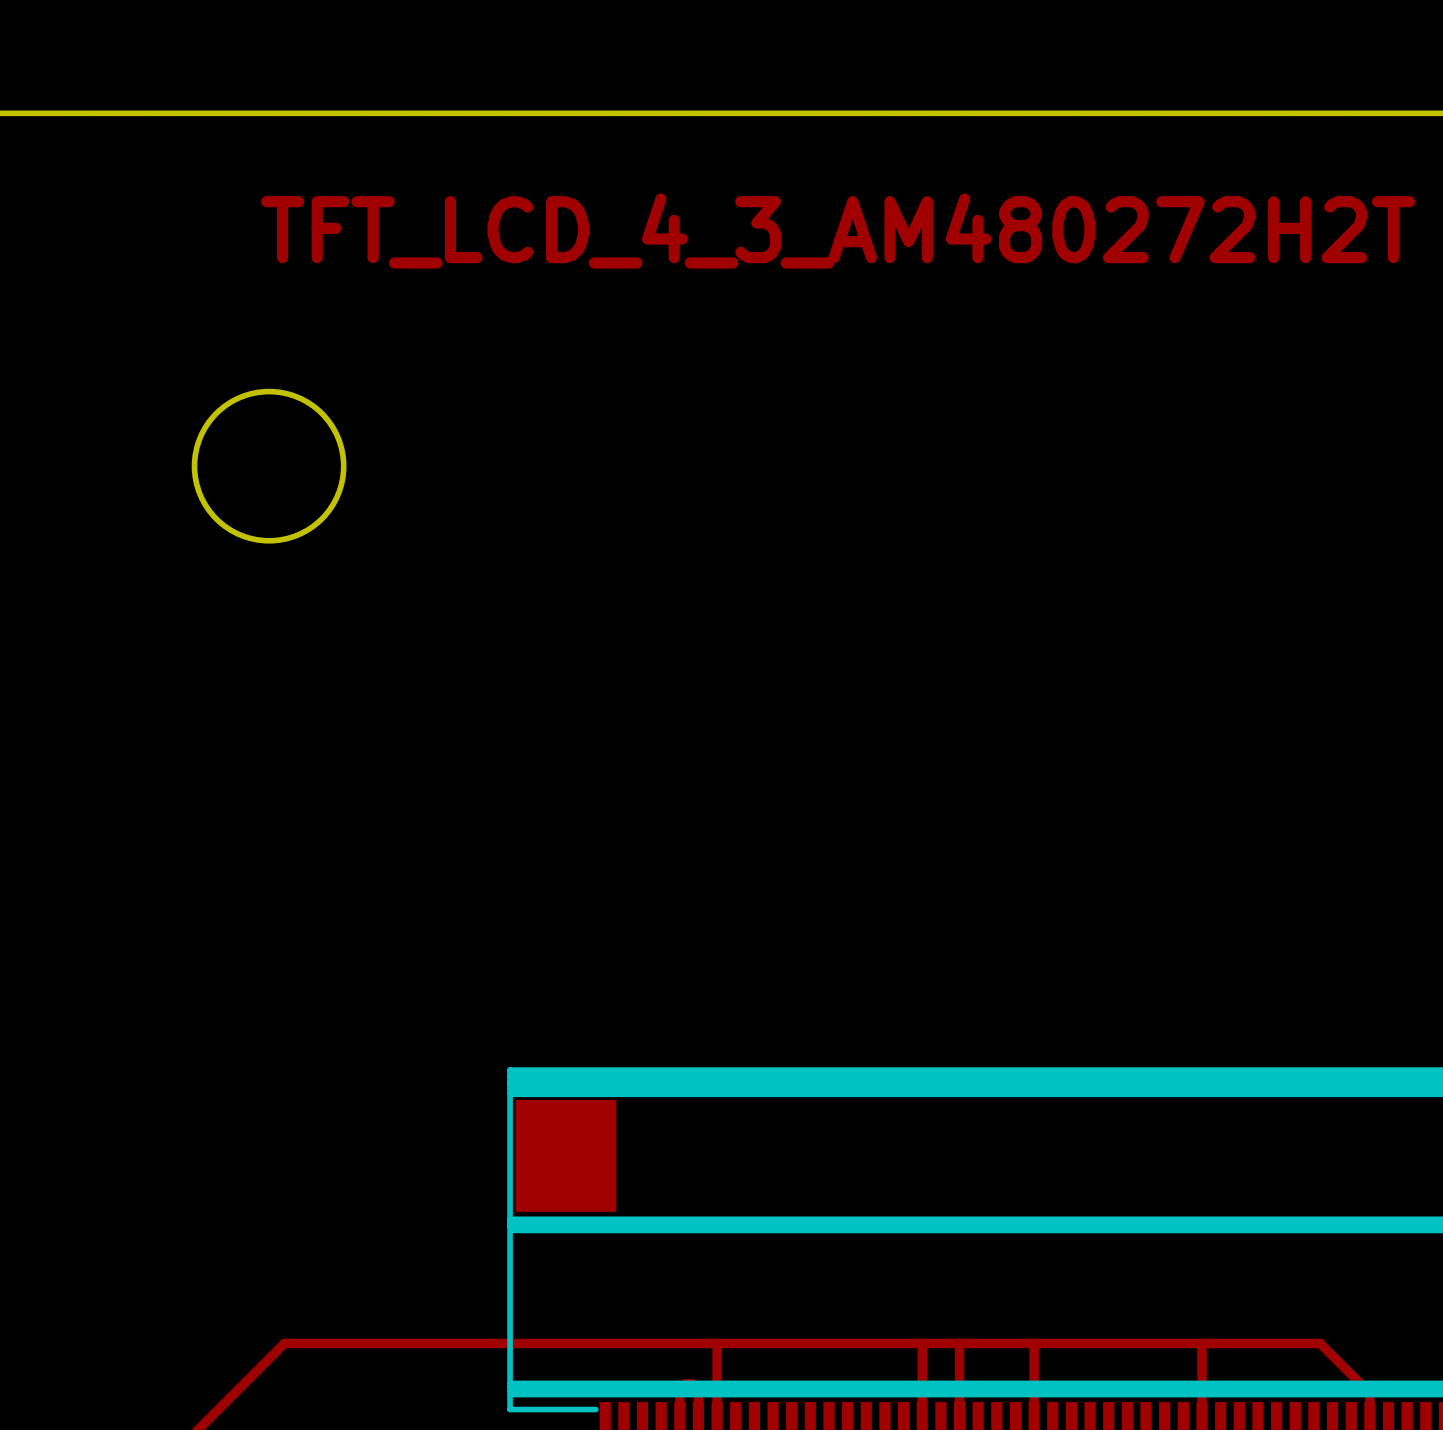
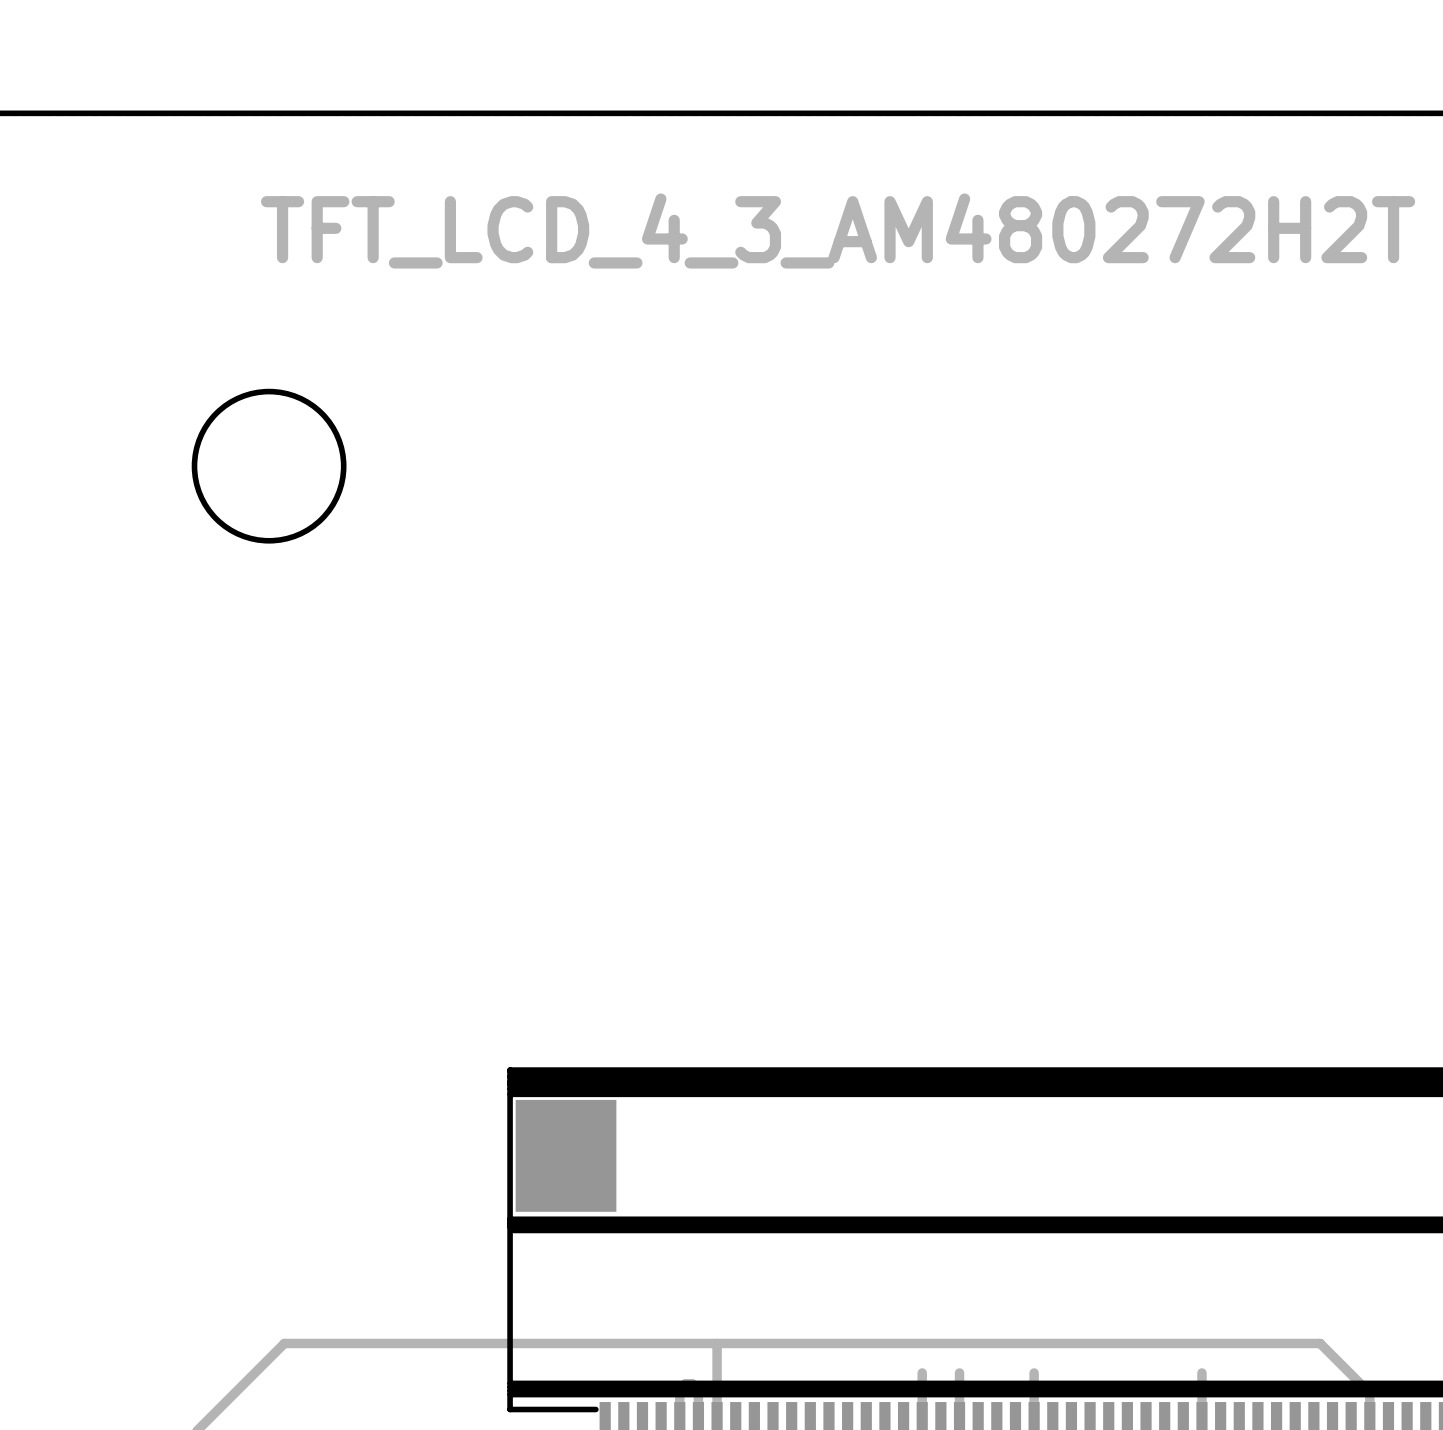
track: (922, 1343) (922, 1372) -> none
track: (959, 1343) (959, 1372) -> none
track: (1034, 1343) (1034, 1372) -> none
track: (1201, 1343) (1201, 1372) -> none

